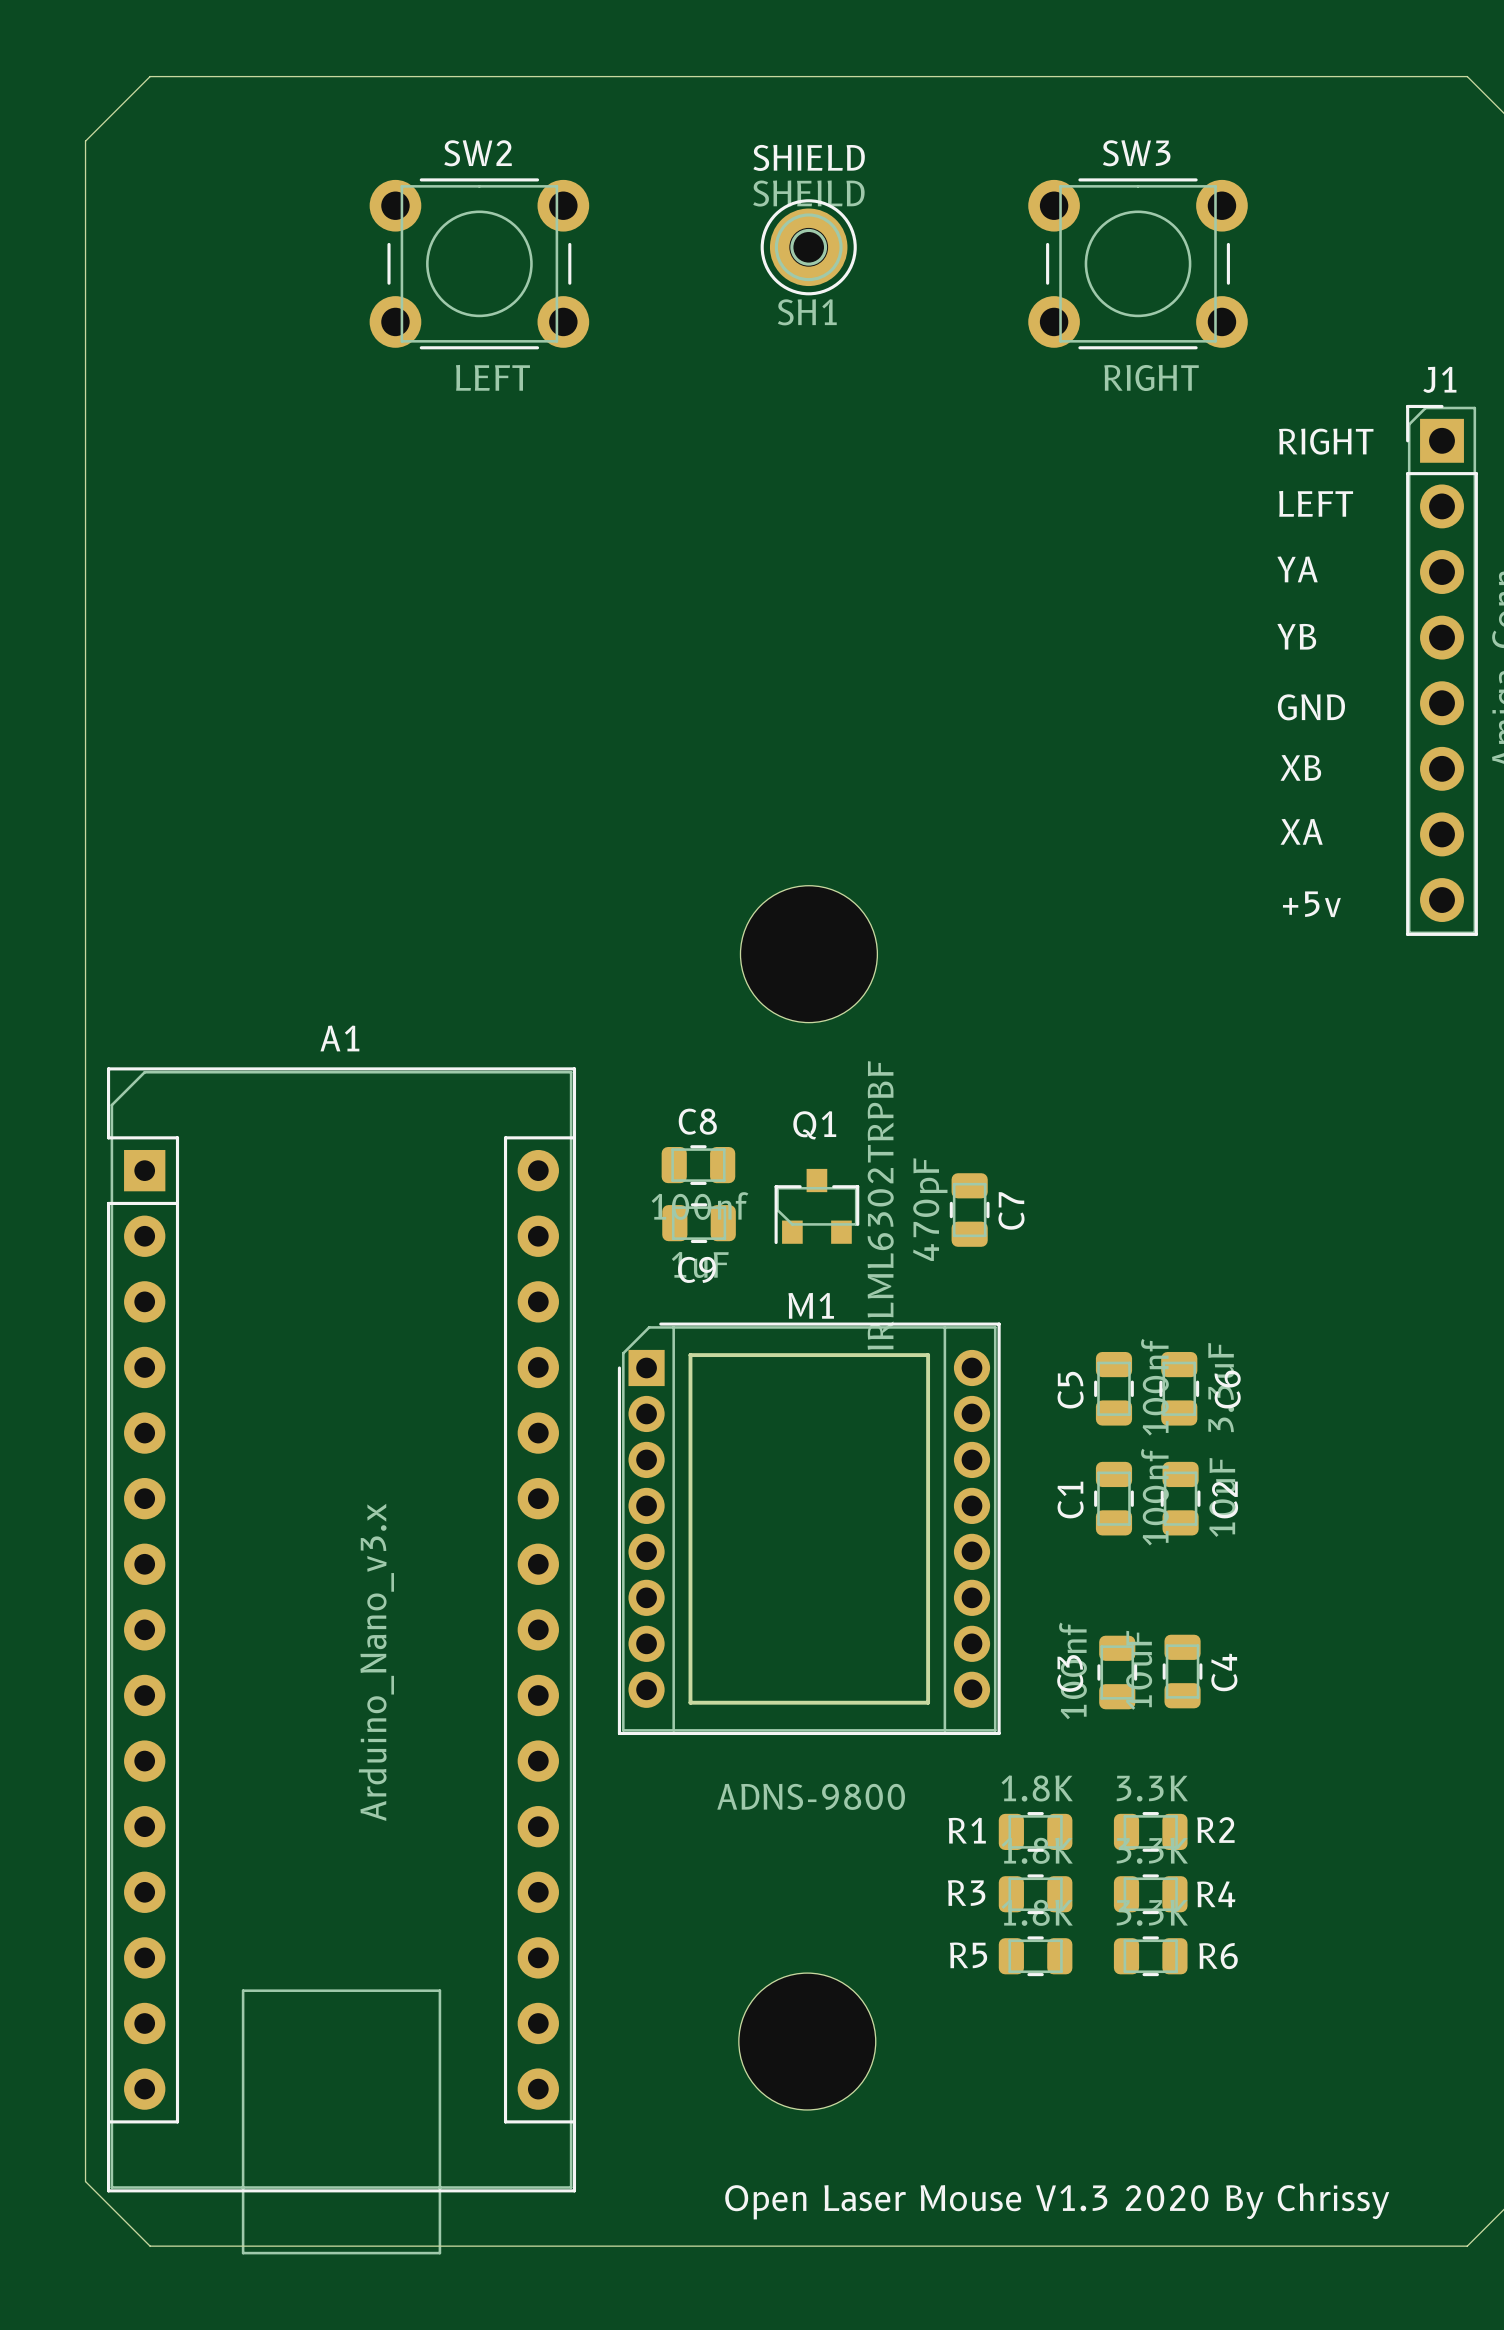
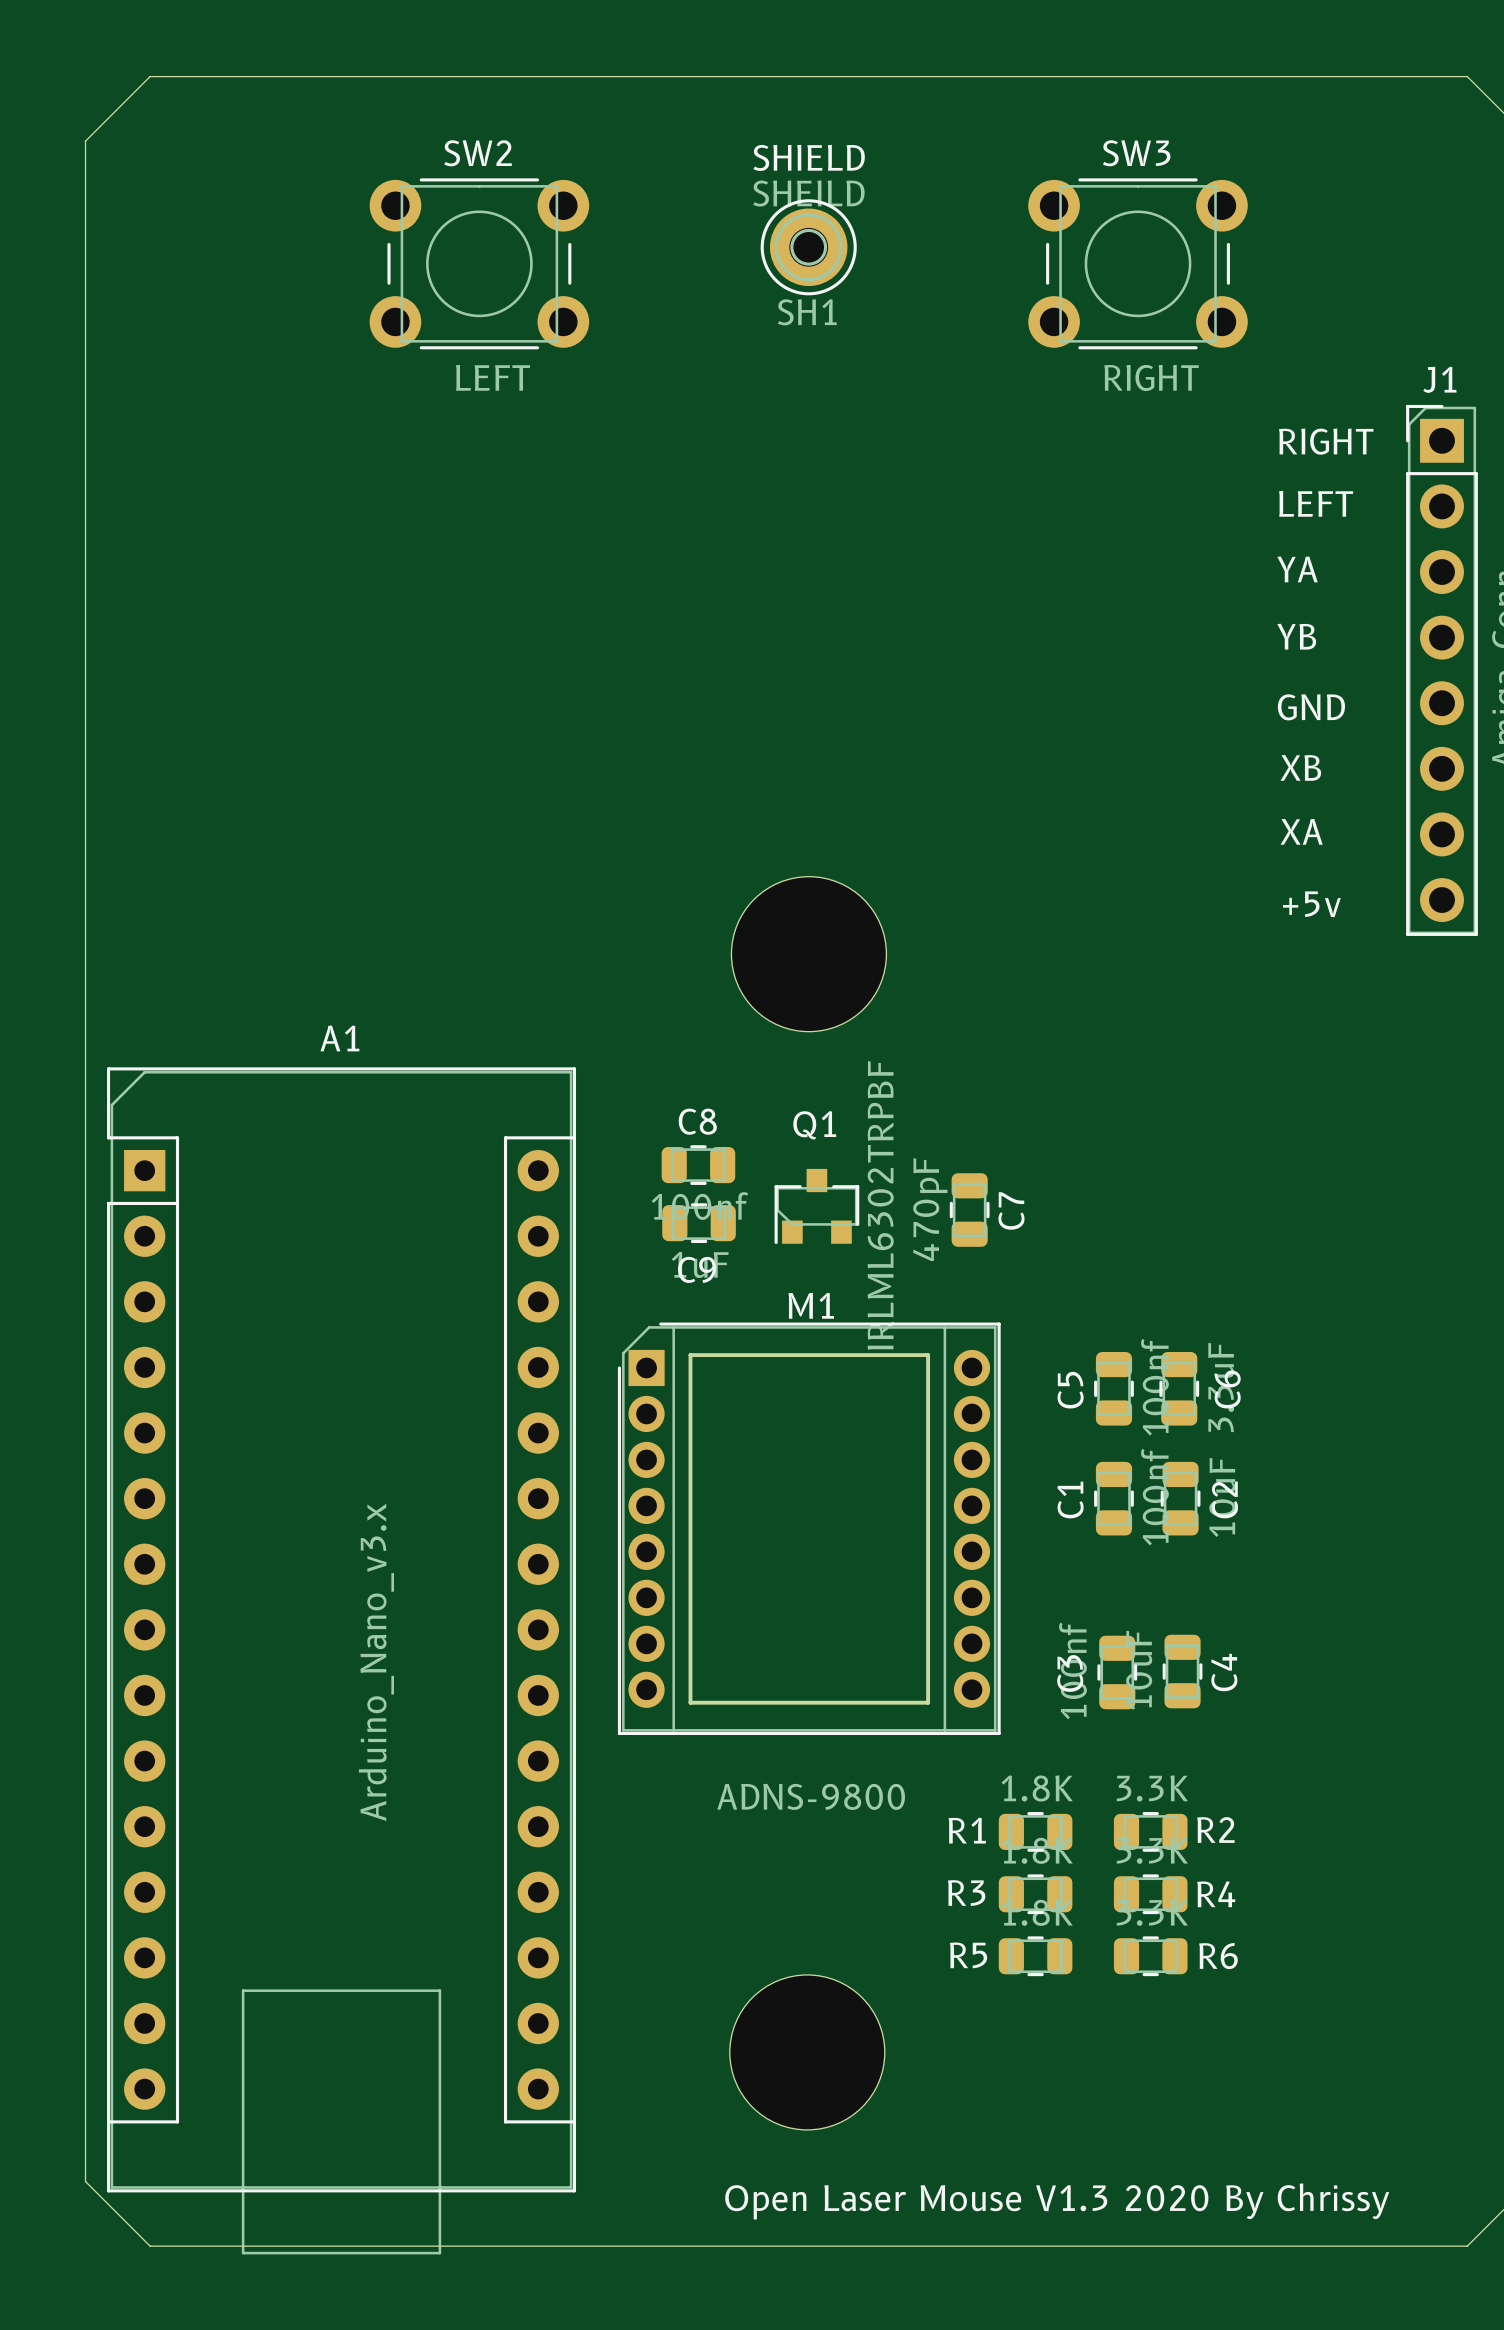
part footprint: [740, 885, 878, 1023] -> [731, 876, 887, 1032]
part footprint: [738, 1973, 876, 2110] -> [729, 1974, 885, 2130]

